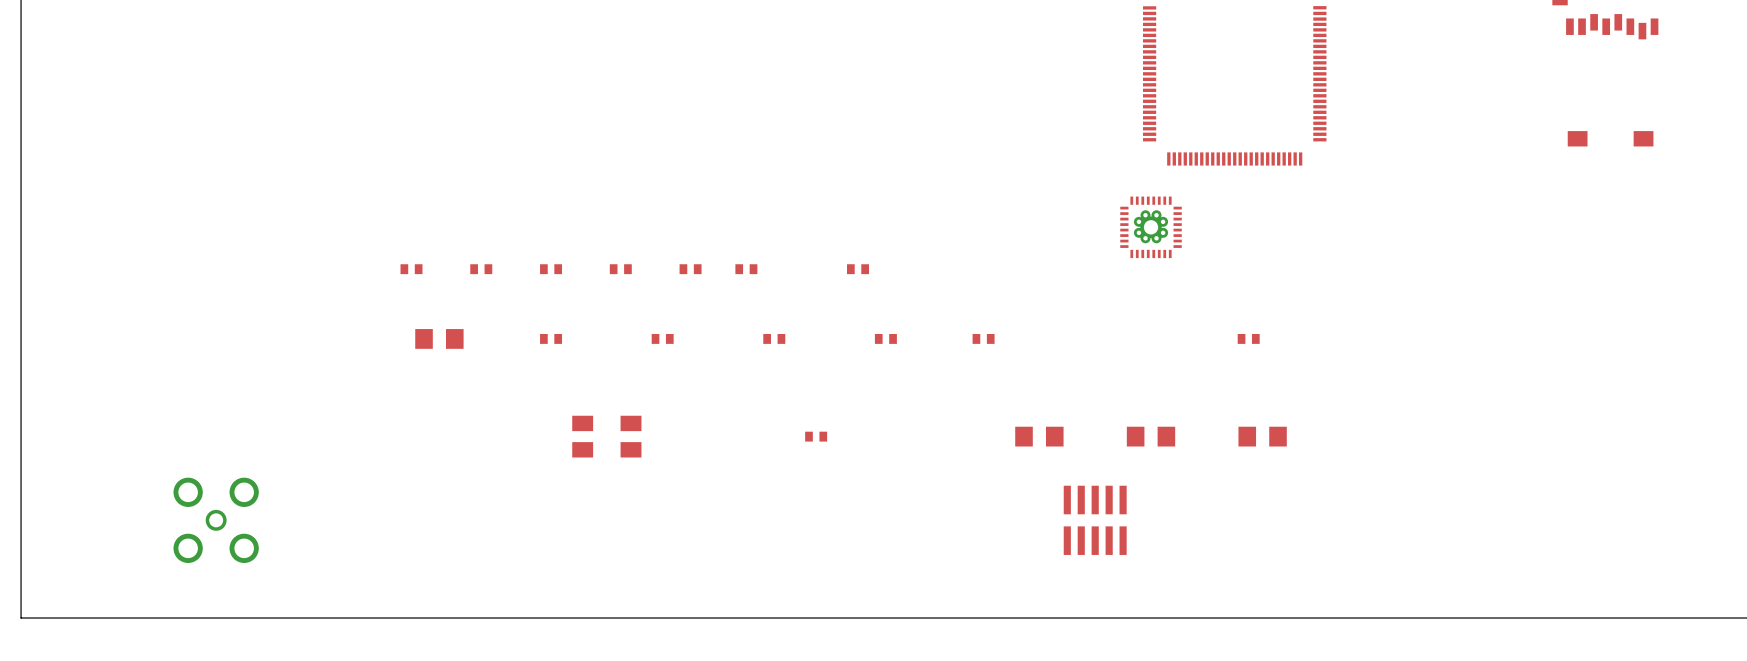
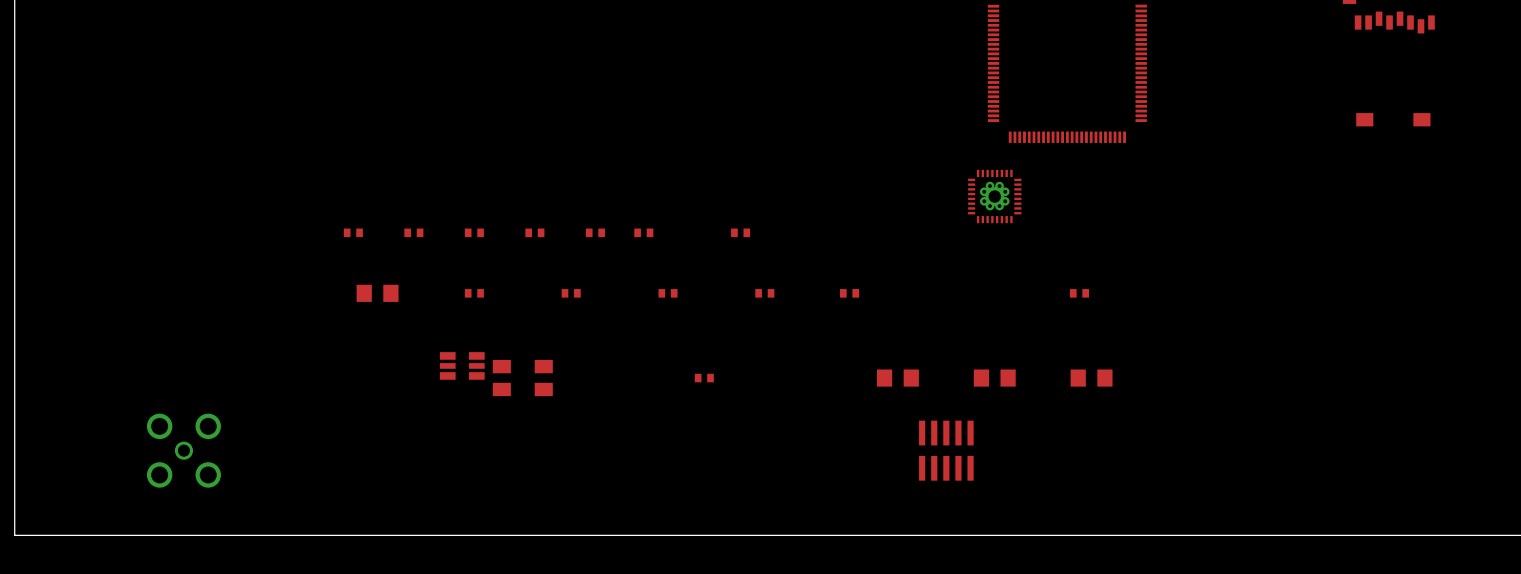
part: none -> (462, 365)

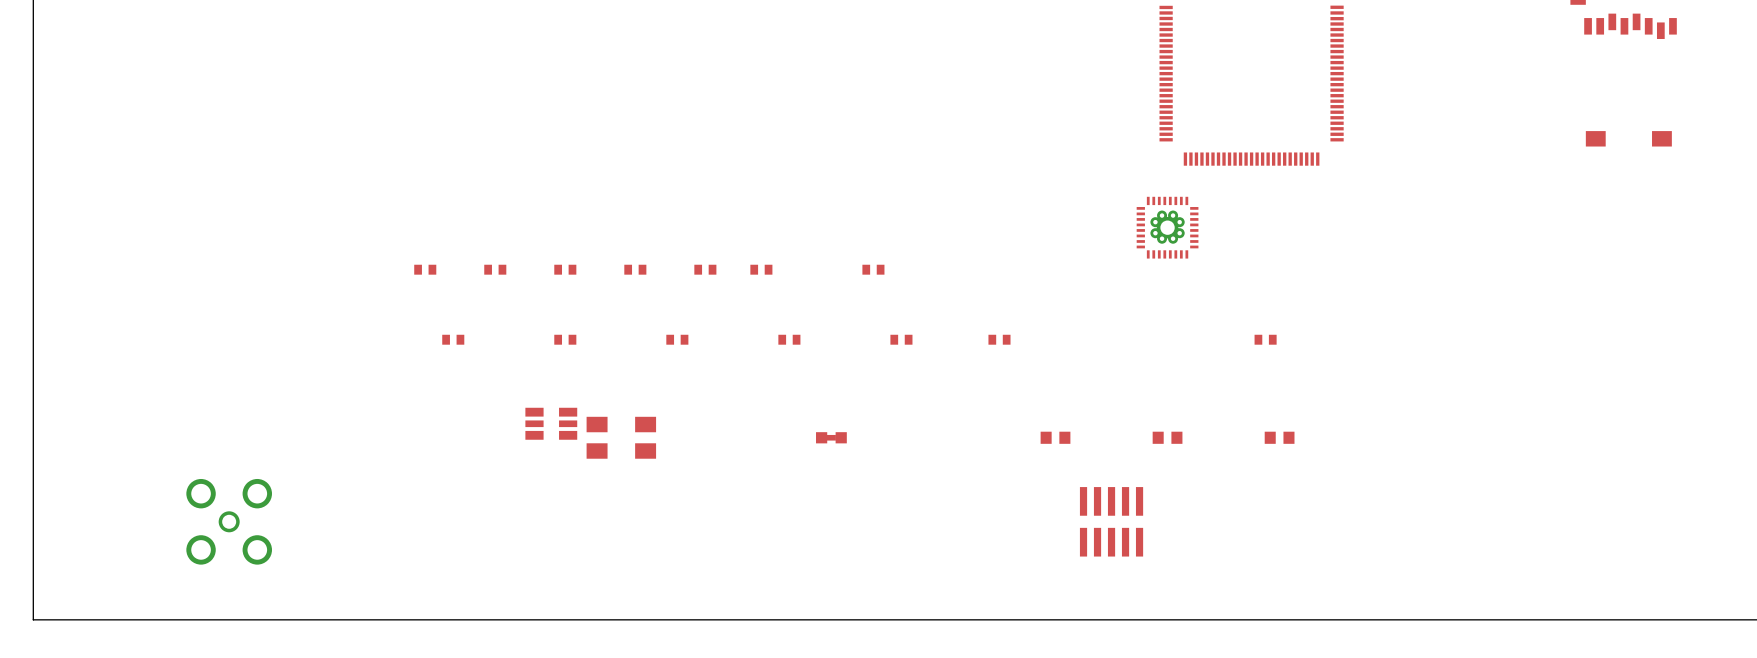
part footprint: [356, 284, 399, 302] -> [442, 334, 465, 345]
part footprint: [876, 369, 919, 387] -> [1040, 431, 1071, 444]
part footprint: [973, 369, 1016, 387] -> [1152, 431, 1183, 444]
part footprint: [1070, 369, 1113, 387] -> [1264, 431, 1295, 444]
part footprint: [694, 373, 714, 383] -> [816, 432, 847, 444]

